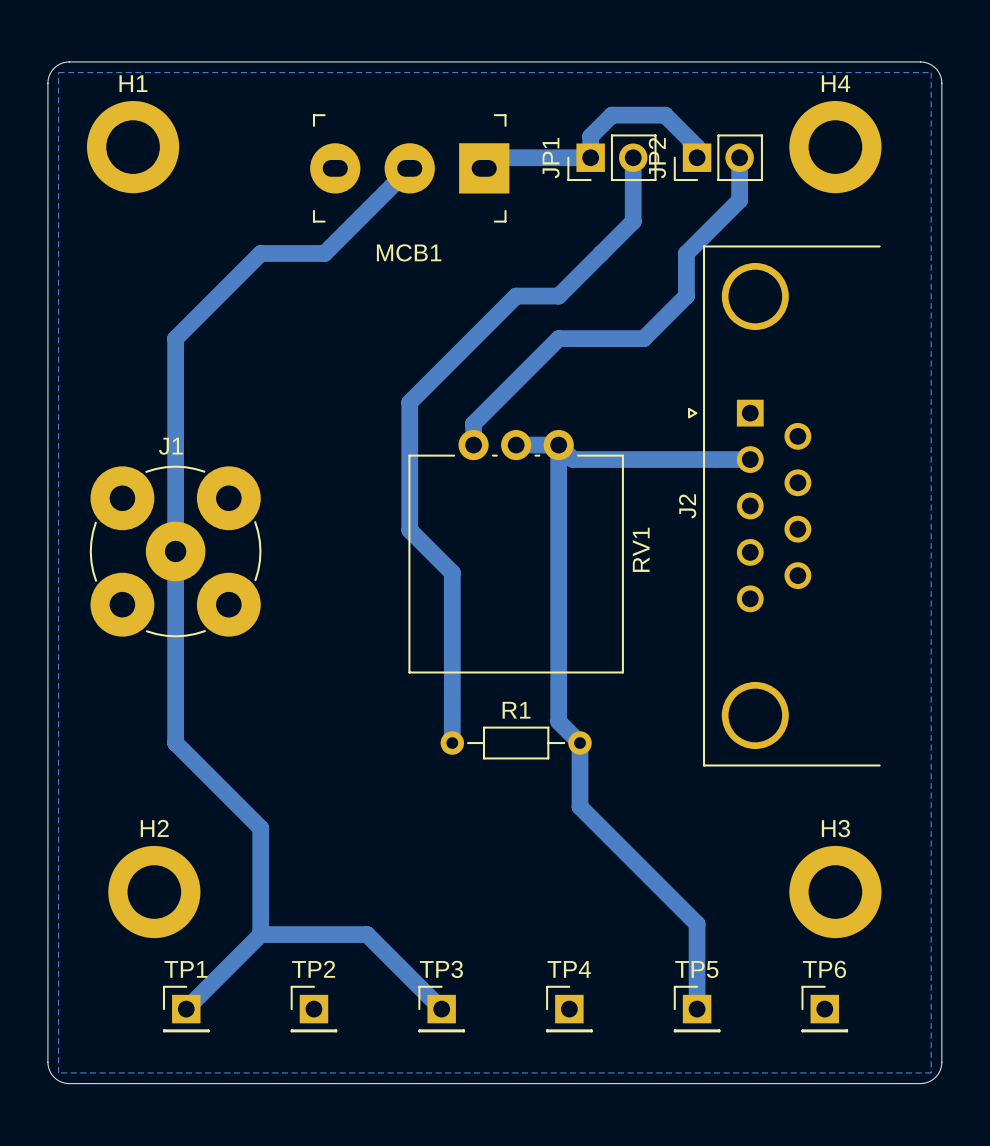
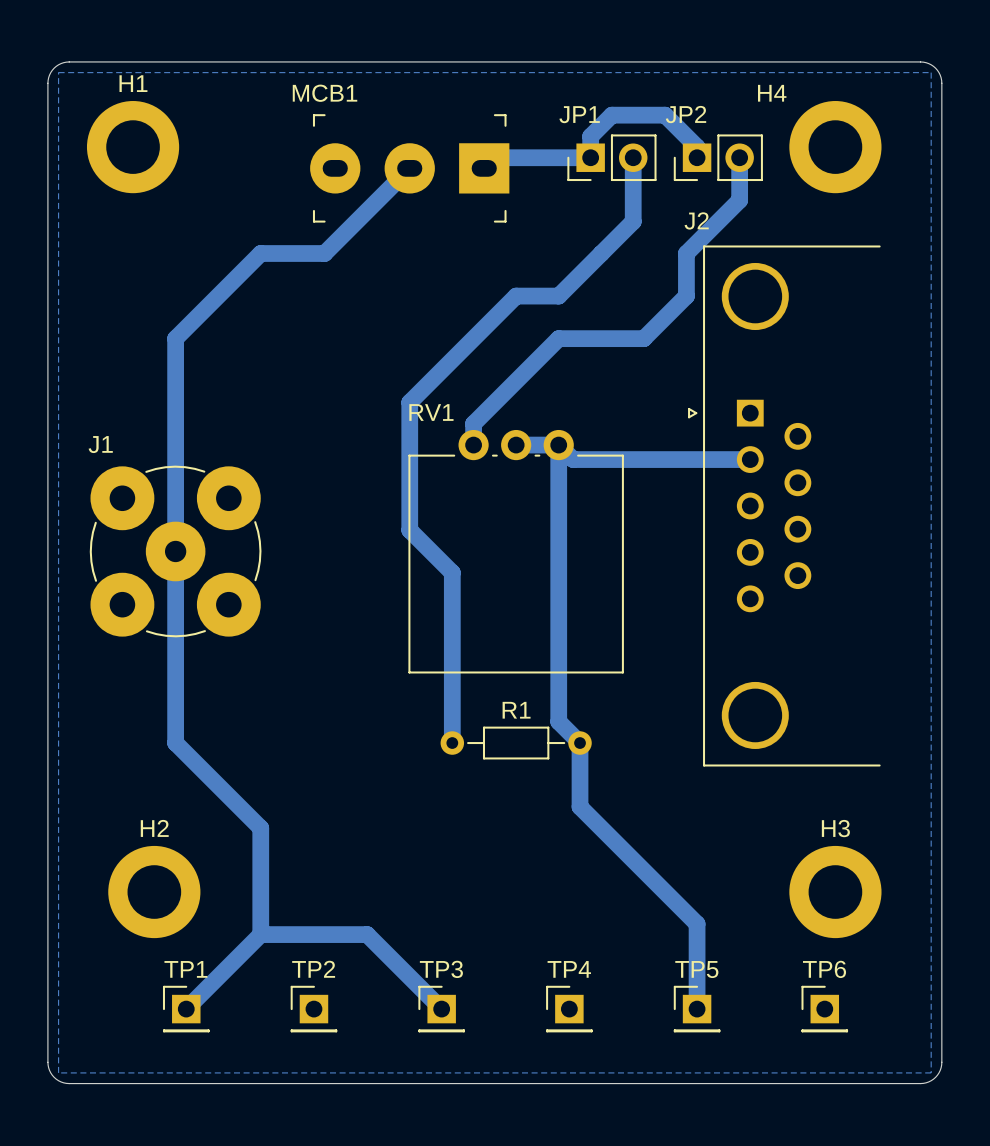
H4 name position: H4 (836, 83) -> H4 (772, 93)
JP1 name rotation: 0° (551, 158) -> 90° clockwise (579, 114)
JP2 name rotation: 0° (657, 158) -> 90° clockwise (686, 114)
MCB1 name position: MCB1 (409, 252) -> MCB1 (325, 93)
J1 name position: J1 (171, 446) -> J1 (100, 444)
J2 name rotation: 0° (687, 506) -> 90° clockwise (696, 220)
J2 name position: J2 (687, 506) -> J2 (696, 220)
RV1 name rotation: 0° (641, 549) -> 90° clockwise (431, 412)
RV1 name position: RV1 (641, 549) -> RV1 (431, 412)

